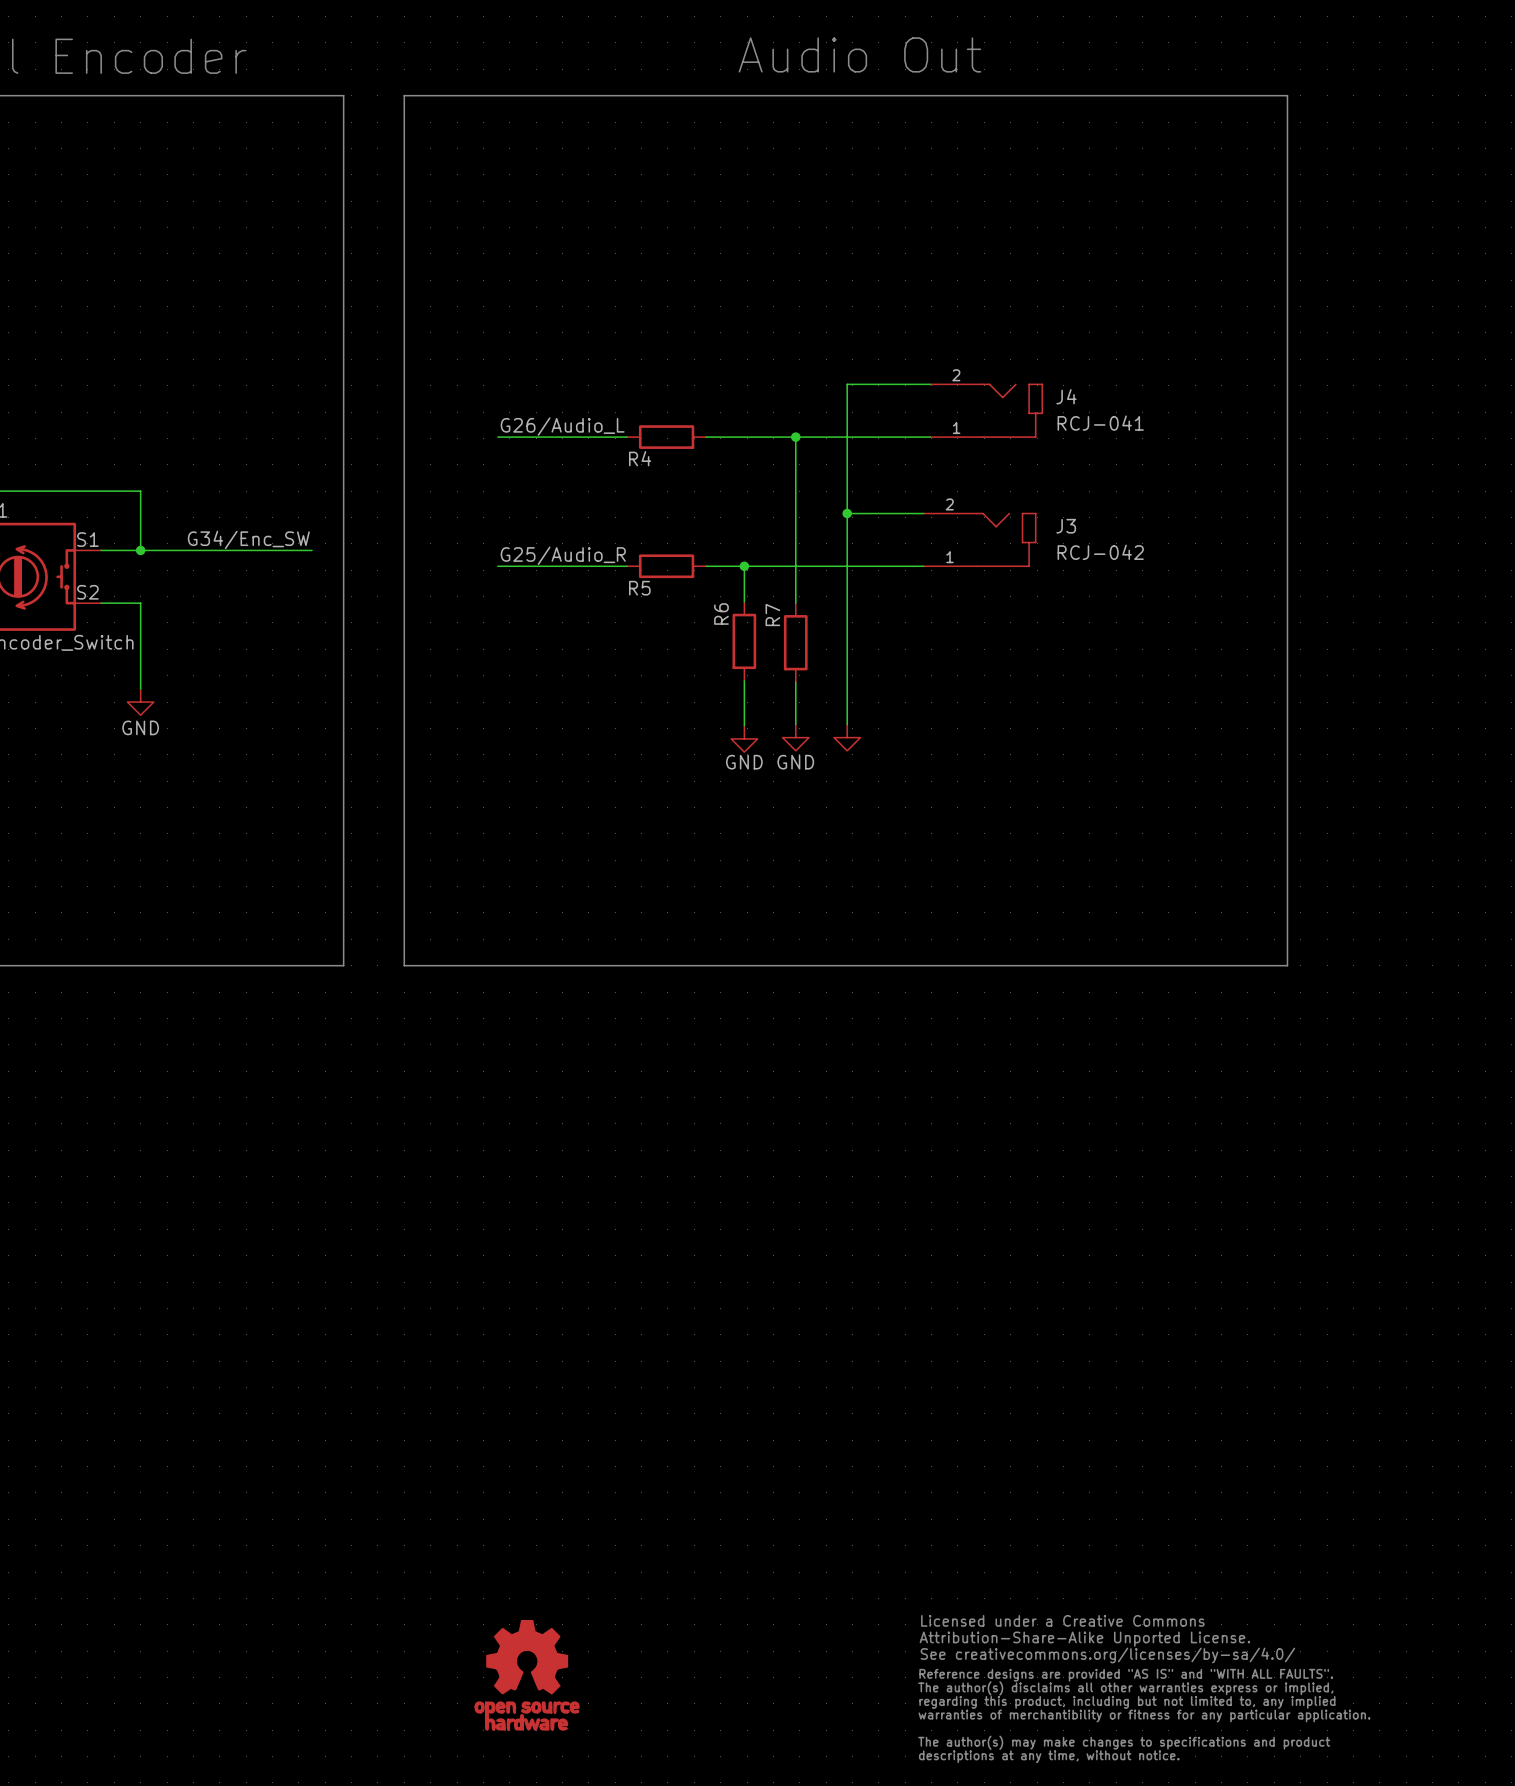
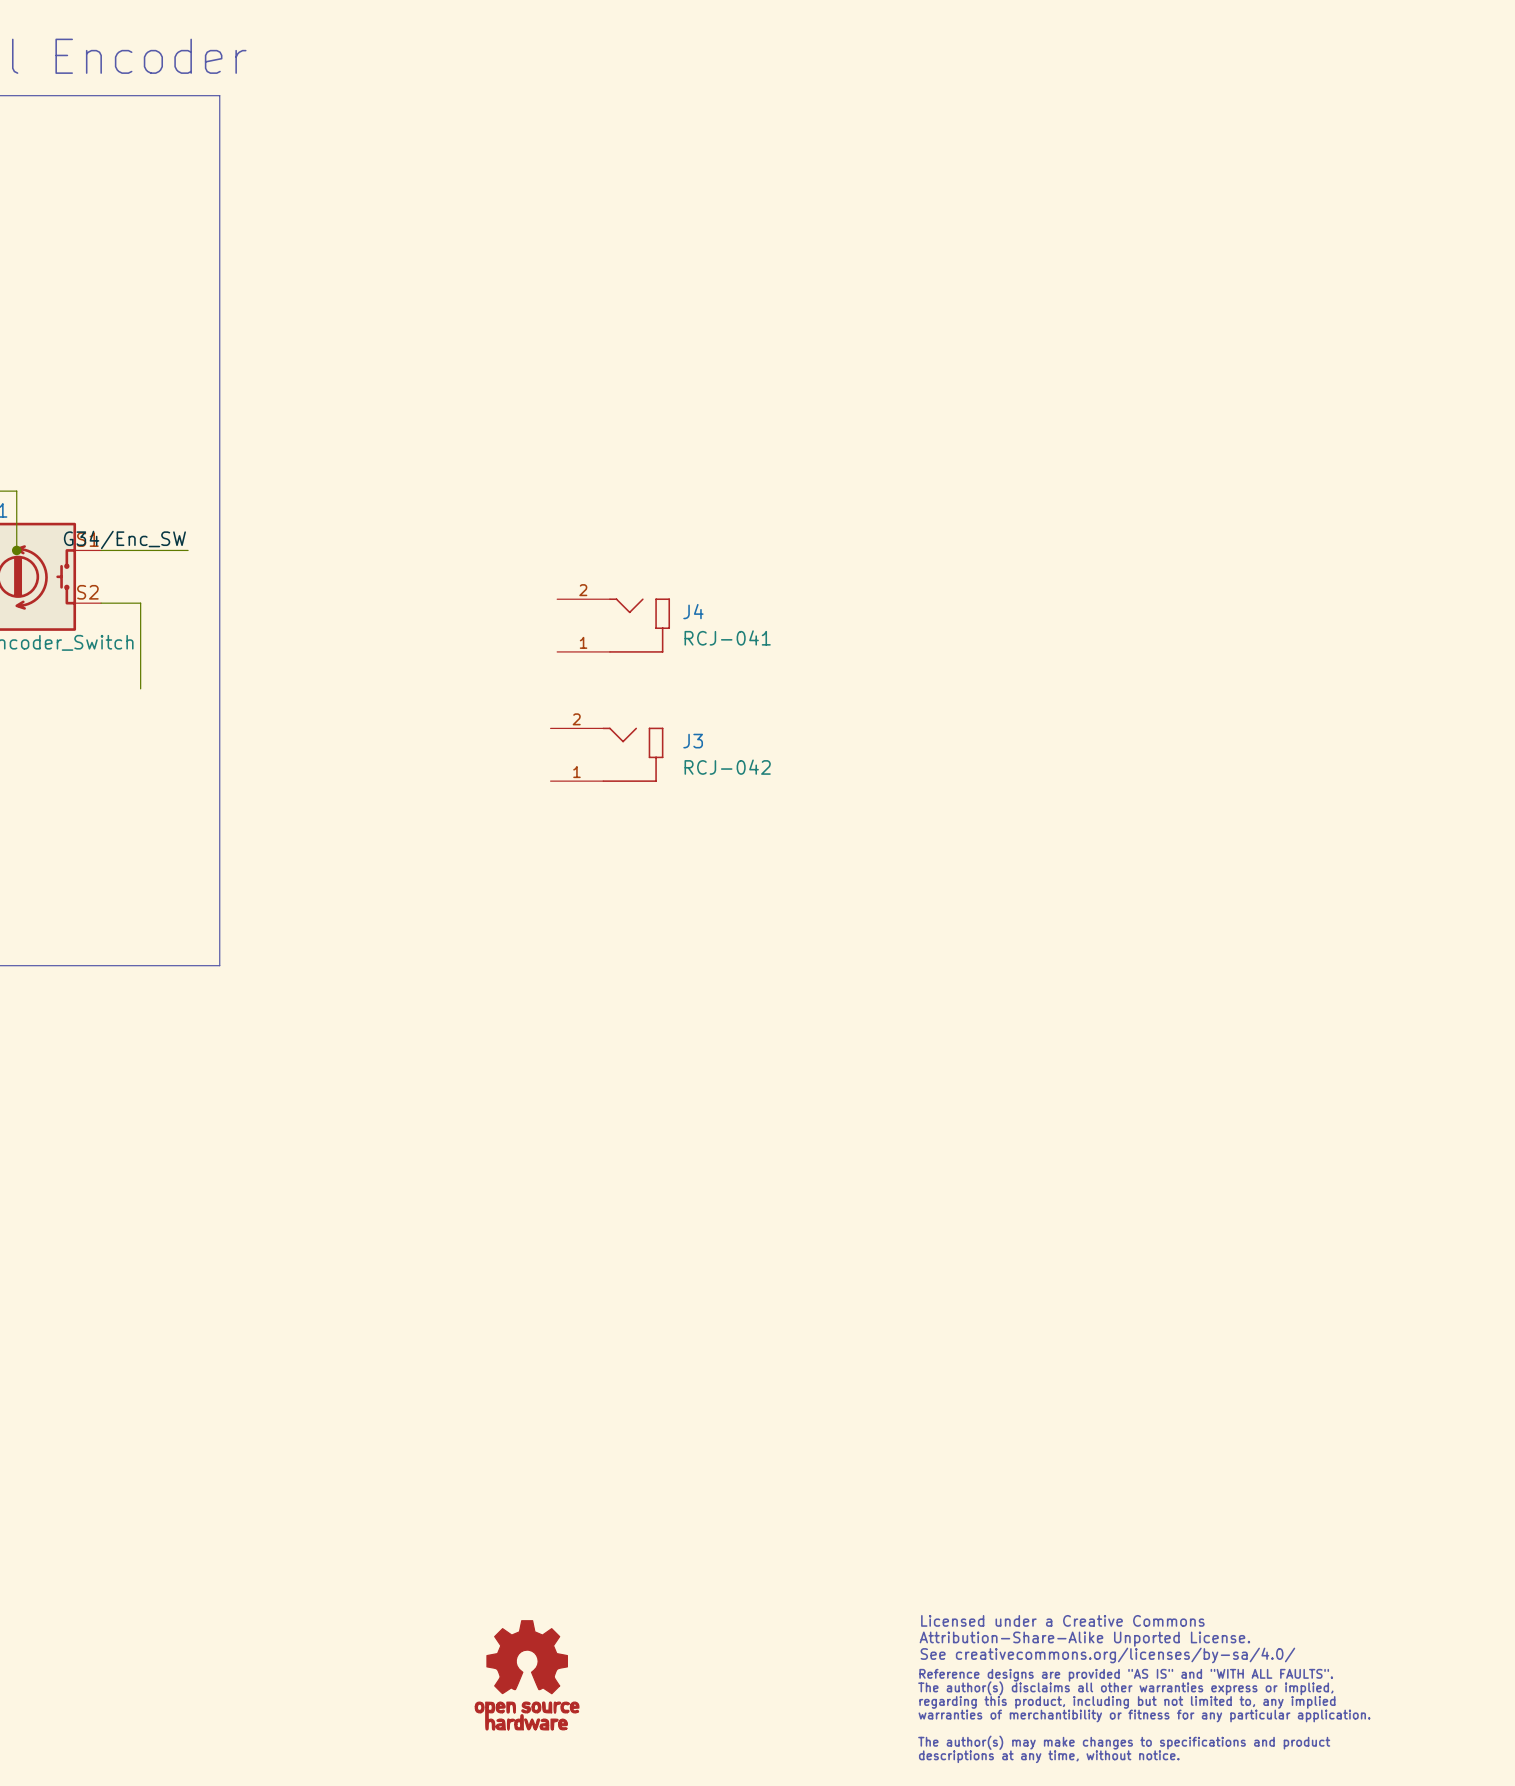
text: Audio Out (859, 54) -> none
line: (219, 95) (343, 95) (343, 965) (219, 965) -> (219, 95) (219, 965)
line: (404, 95) (1287, 95) (1287, 965) (404, 965) (404, 95) -> none
wire: (930, 384) (847, 384) (847, 724) -> none
J4 position: (986, 410) -> (613, 625)
label: G26/Audio_L (562, 426) -> none
wire: (497, 437) (627, 437) -> none
R4: (666, 437) -> none
wire: (706, 437) (930, 437) -> none
wire: (795, 437) (795, 603) -> none
junction: (795, 437) -> none
wire: (16, 491) (140, 491) (140, 550) -> (16, 491) (16, 550)
wire: (847, 513) (923, 513) -> none
junction: (847, 513) -> none
label position: G34/Enc_SW (248, 539) -> G34/Enc_SW (124, 539)
J3 position: (980, 539) -> (607, 754)
junction: none -> (16, 550)
junction: (140, 550) -> none
wire: (188, 550) (312, 550) -> none
label: G25/Audio_R (563, 555) -> none
wire: (497, 566) (627, 566) -> none
R5: (666, 566) -> none
wire: (706, 566) (923, 566) -> none
wire: (744, 566) (744, 601) -> none
junction: (744, 566) -> none
R6: (744, 641) -> none
R7: (795, 642) -> none
wire: (744, 680) (744, 725) -> none
wire: (795, 682) (795, 724) -> none
power symbol: GND (140, 702) -> none
power symbol: GND (795, 737) -> none
power symbol: (847, 737) -> none
power symbol: GND (744, 738) -> none

